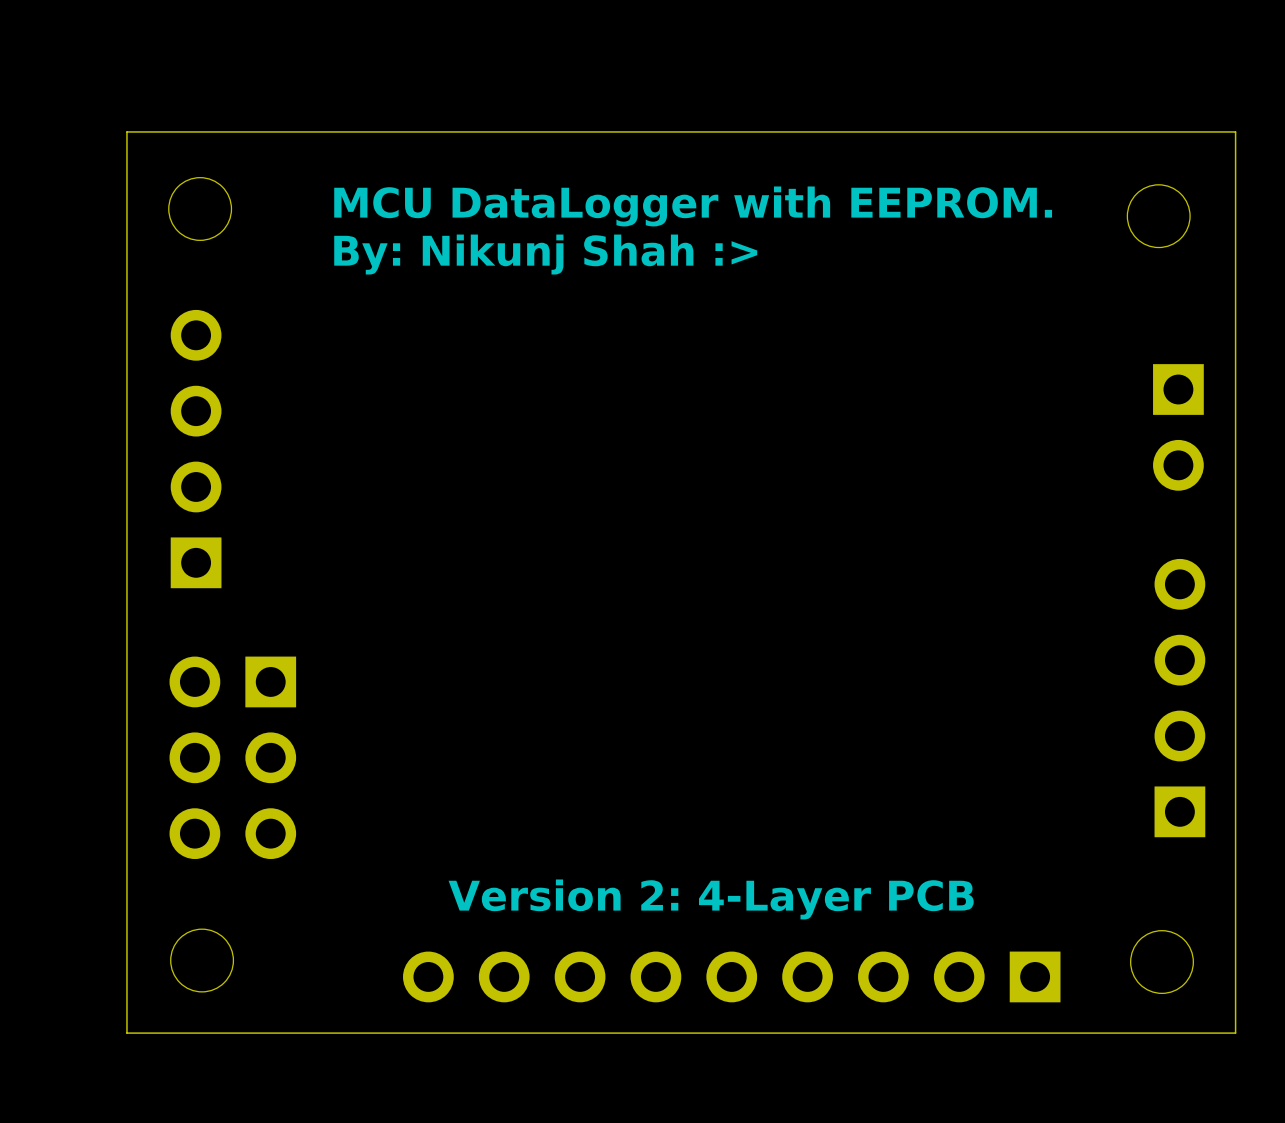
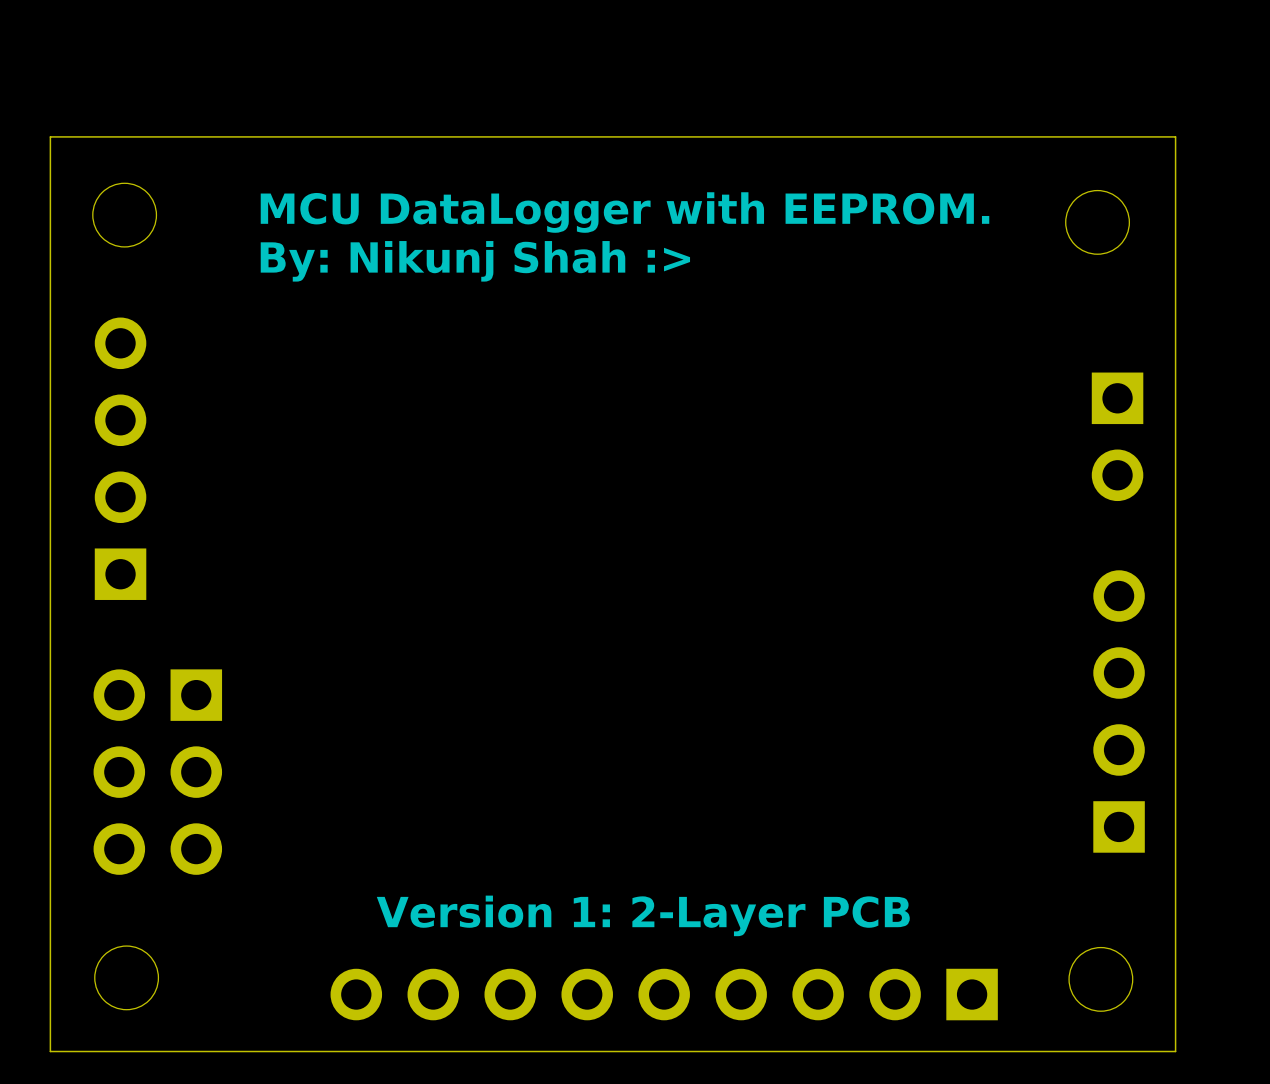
text: Version 2: 4-Layer PCB (711, 899) -> Version 1: 2-Layer PCB (643, 915)

